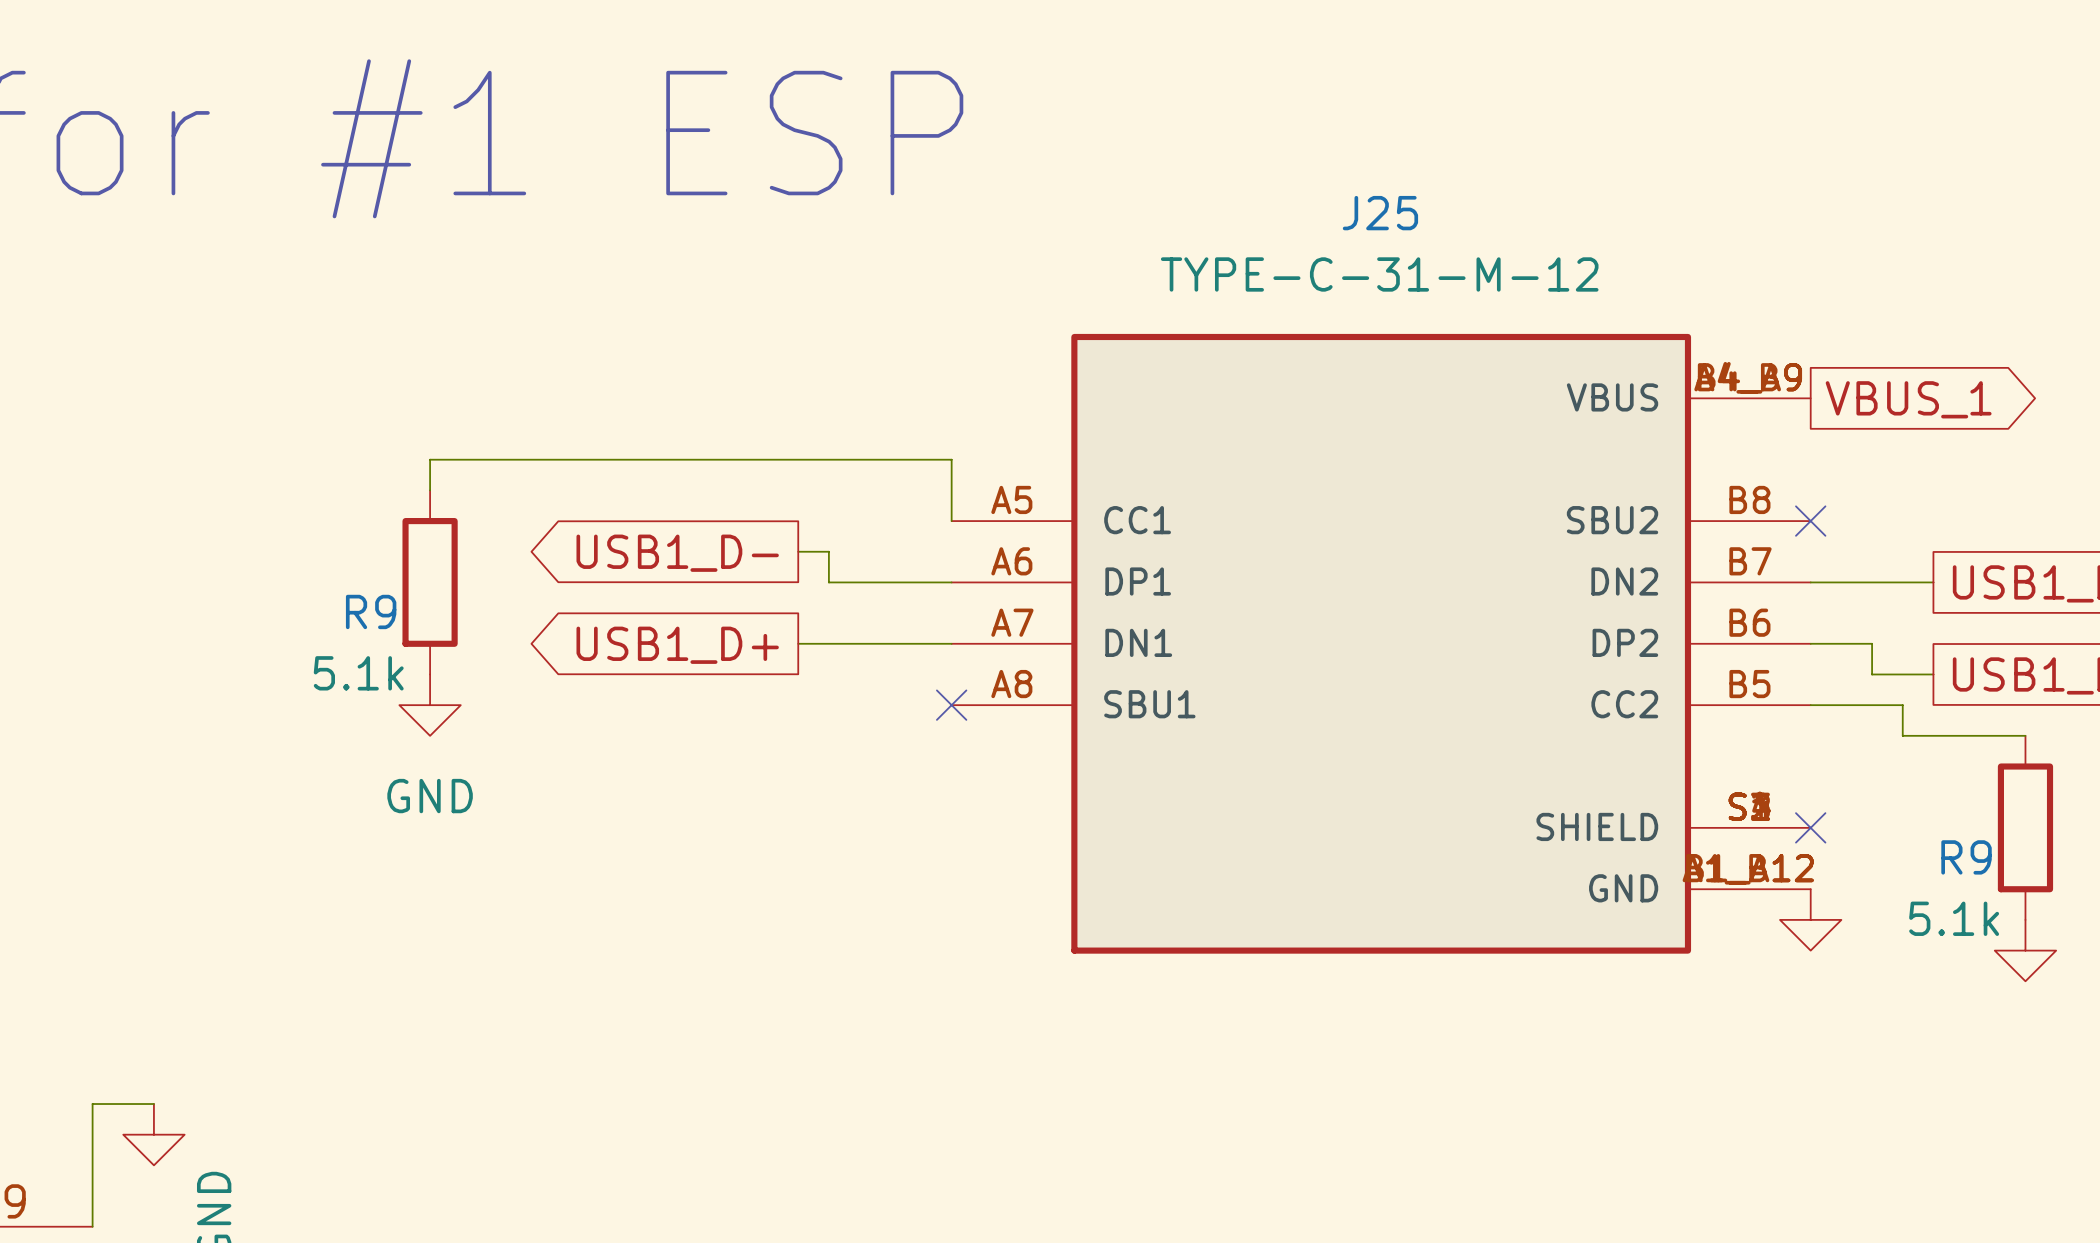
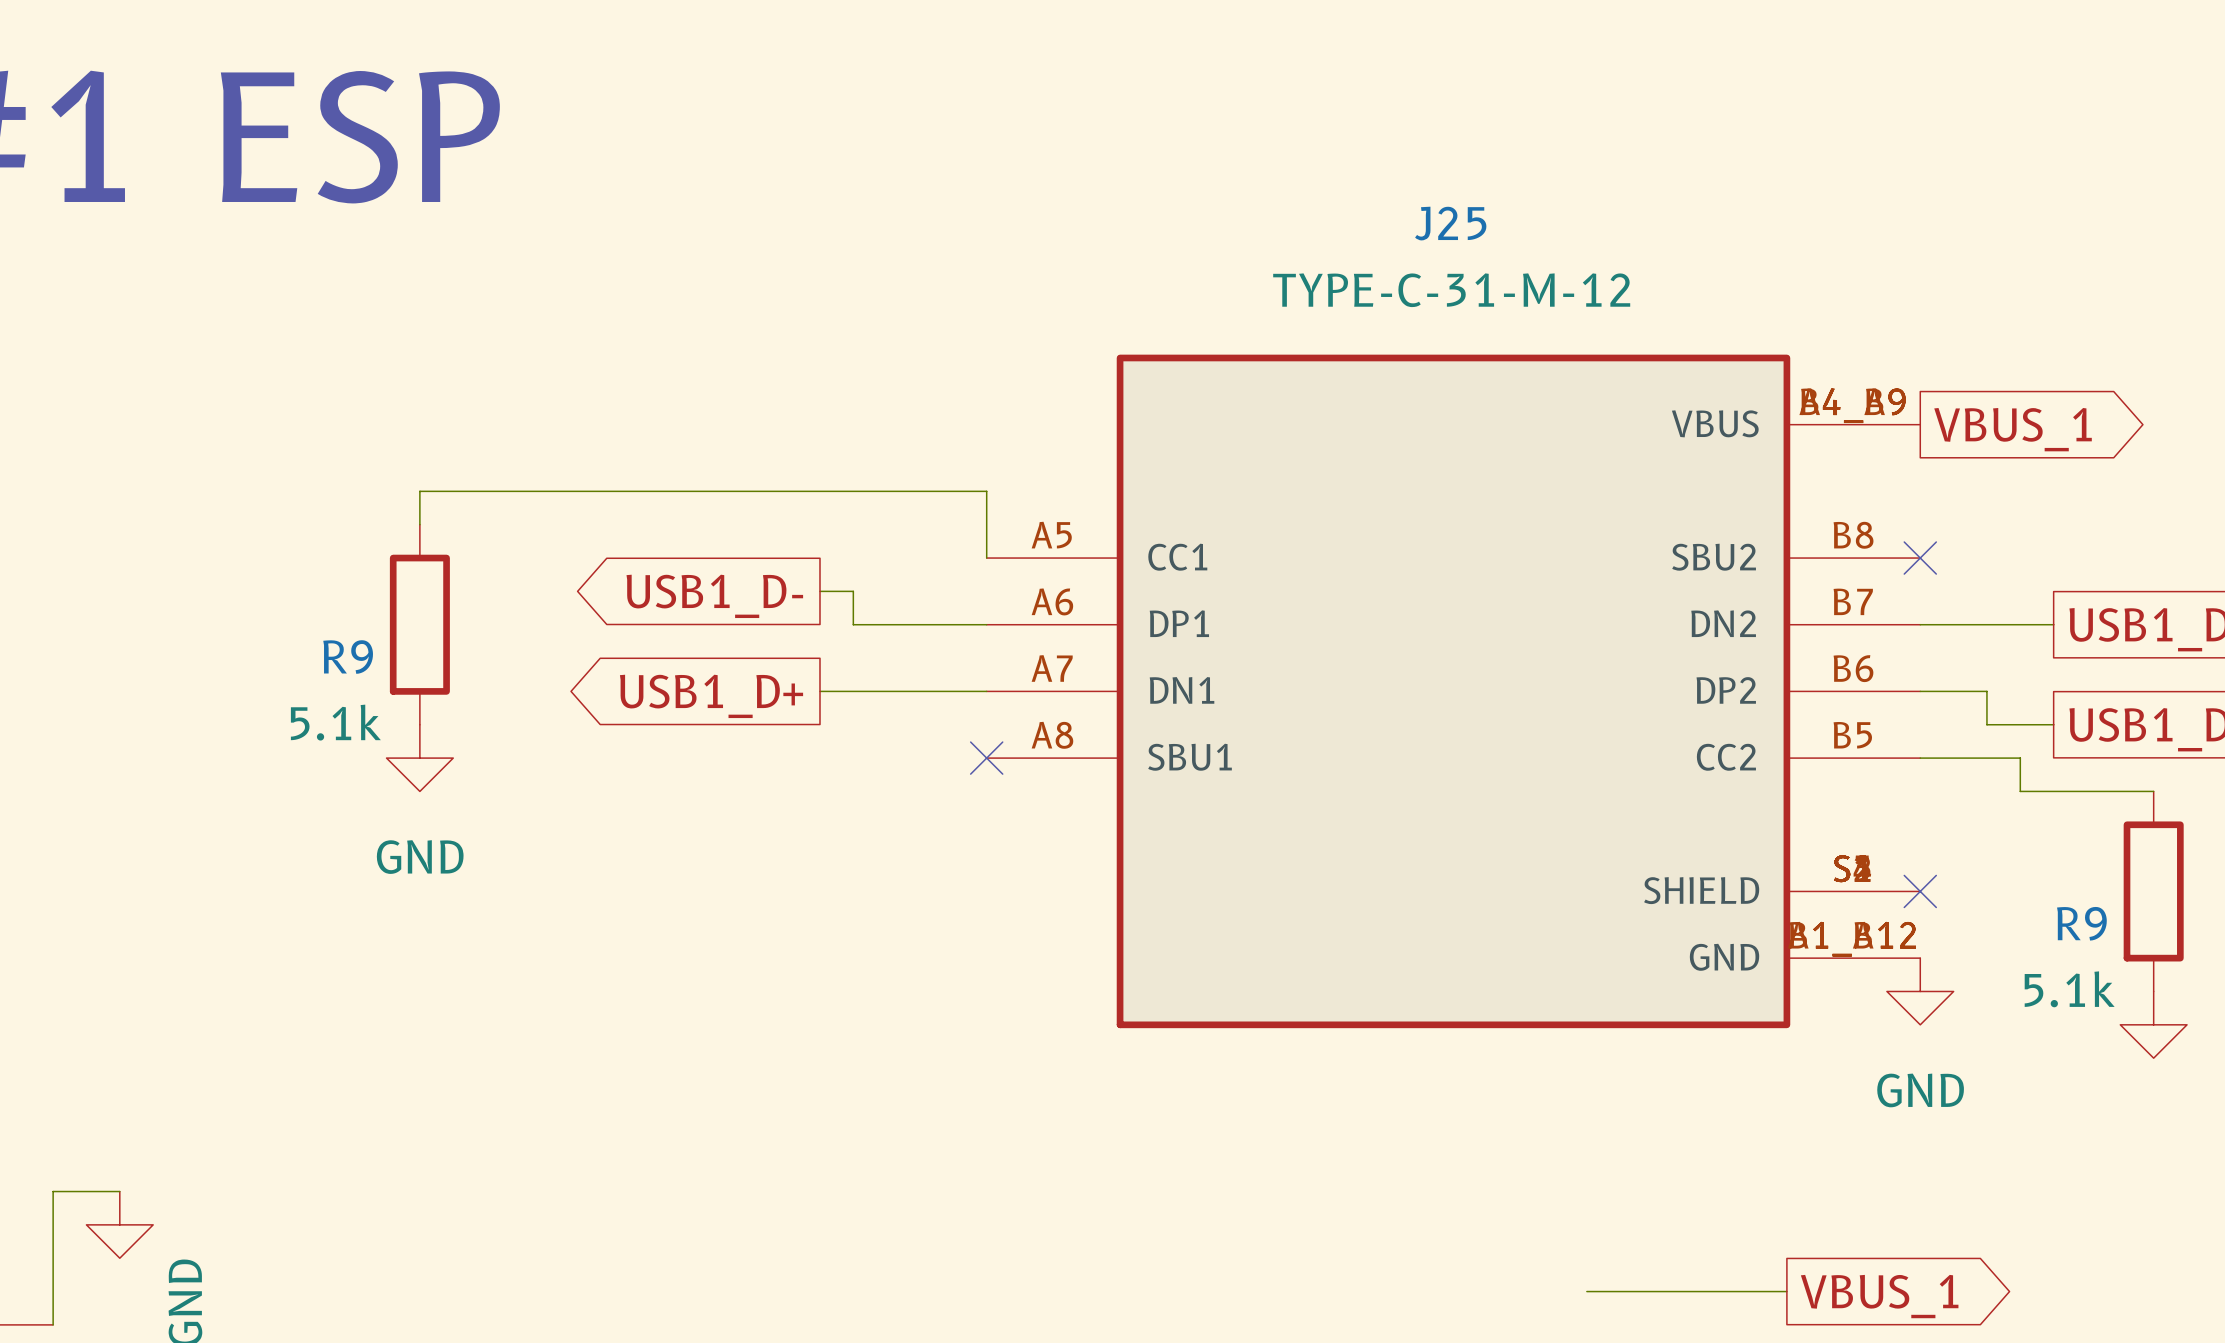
power symbol text: none -> GND (1920, 1090)
wire: none -> (1586, 1291) (1786, 1291)
global label: none -> VBUS_1 (1879, 1296)

